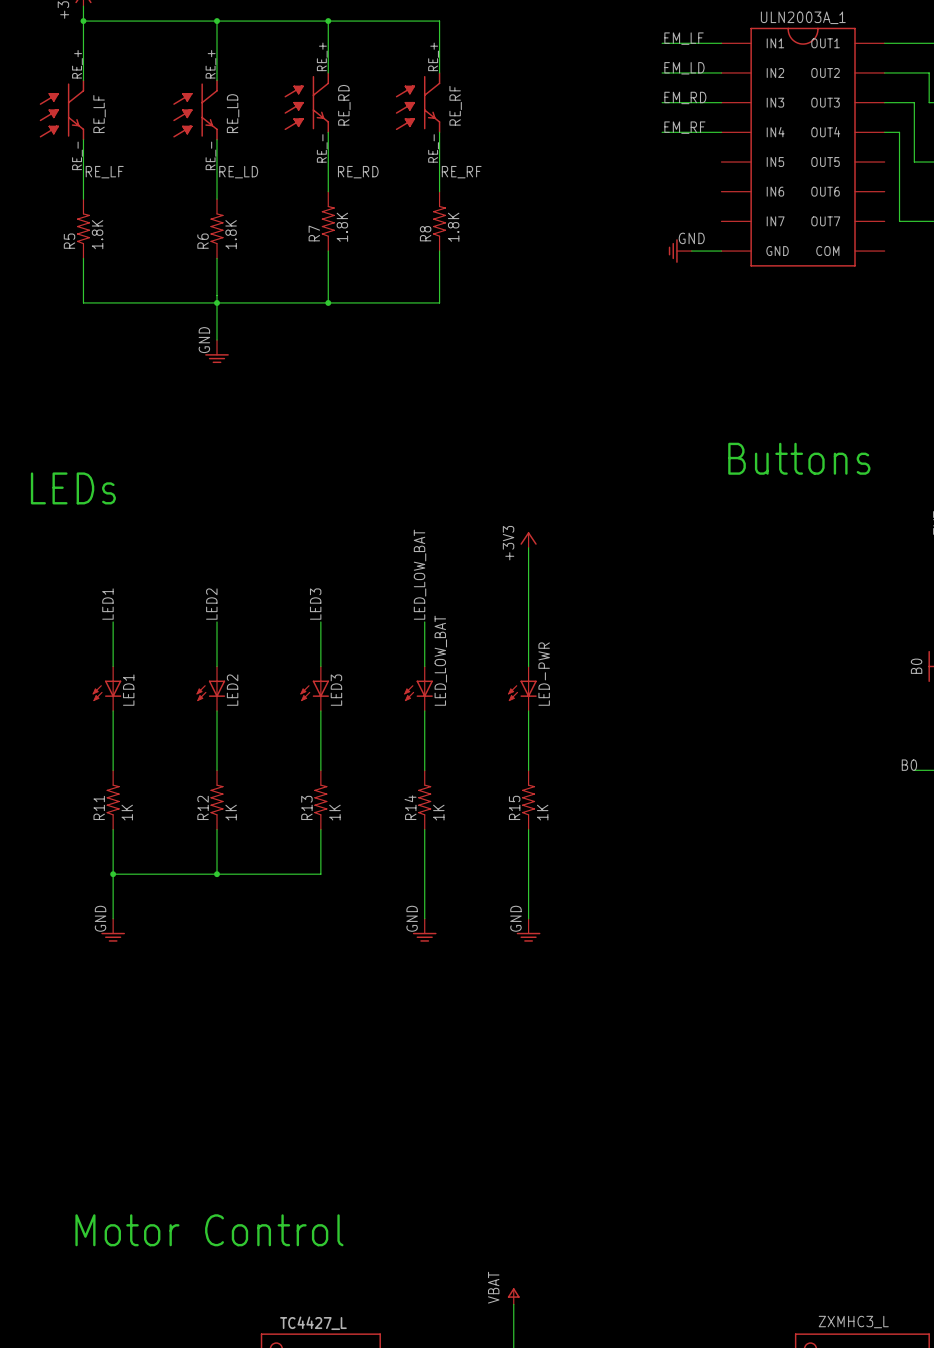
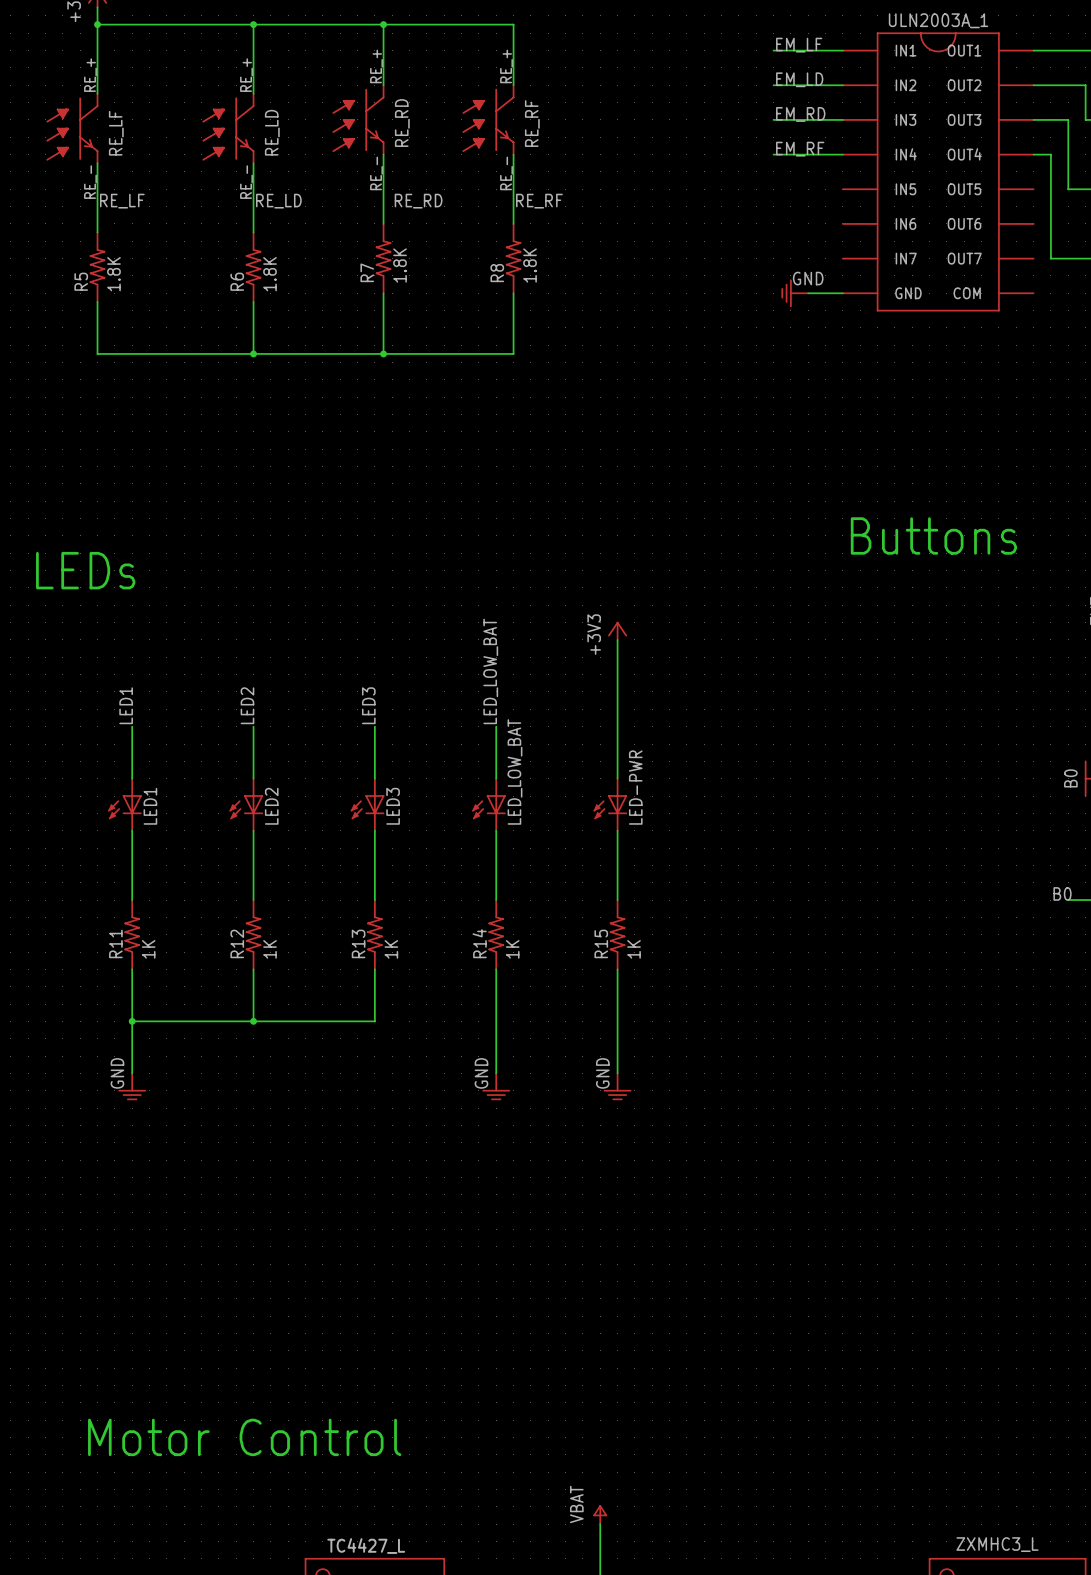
wire: (217, 302) (217, 340) -> none
power symbol: GND (217, 351) -> none

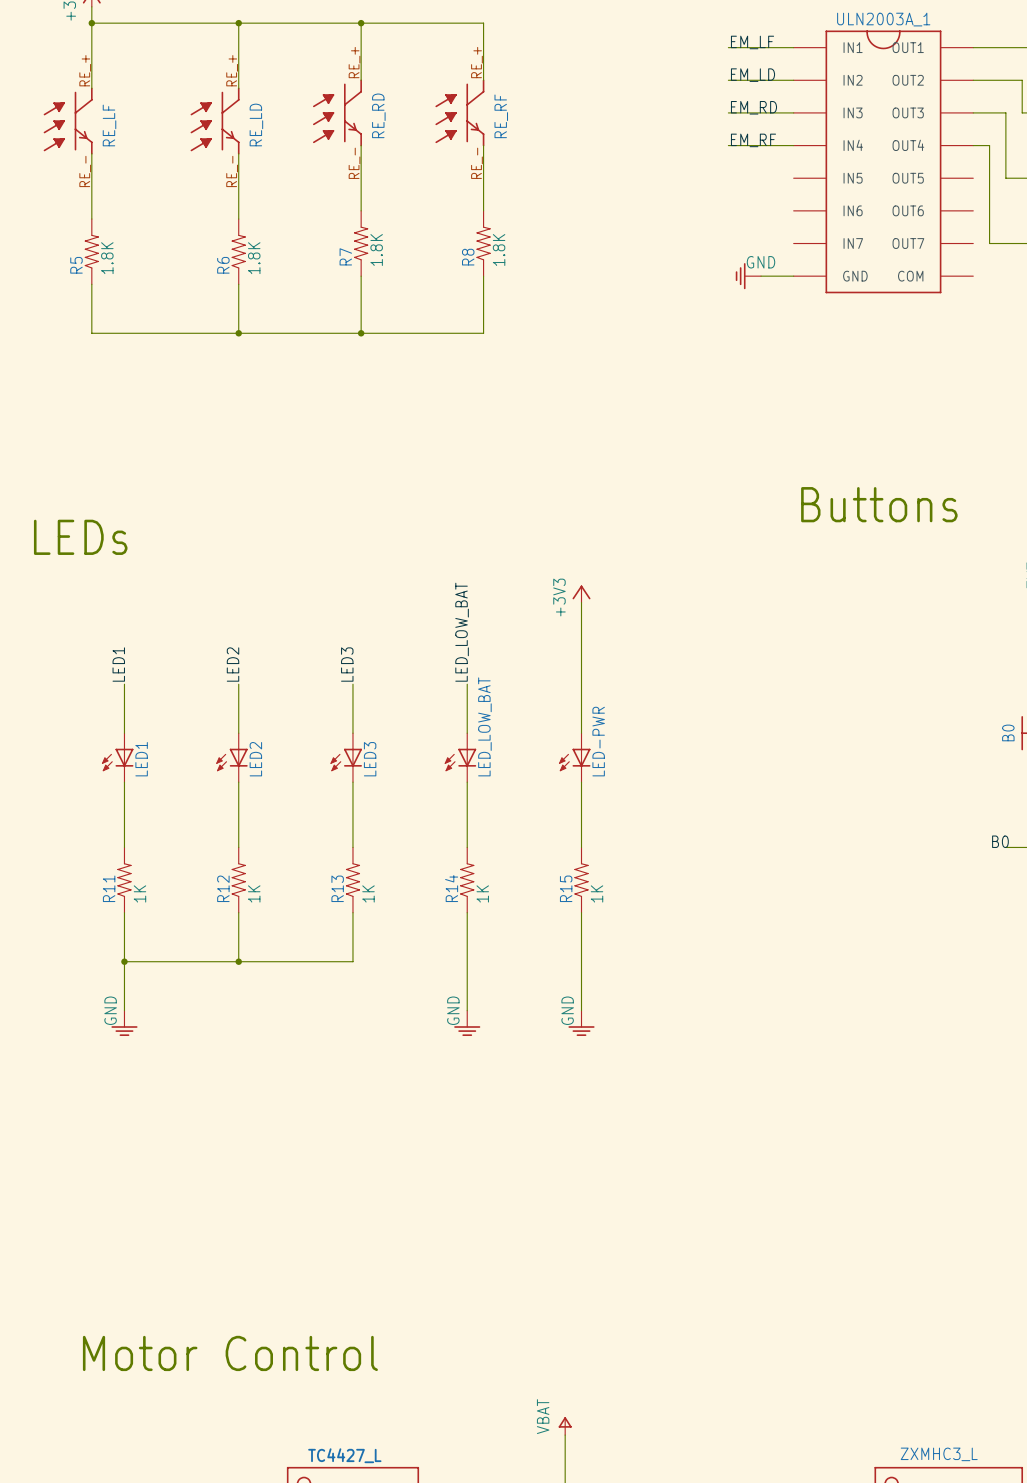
label: RE_LF (122, 201) -> none
label: RE_LD (278, 201) -> none
label: RE_RD (418, 201) -> none
label: RE_RF (539, 201) -> none

